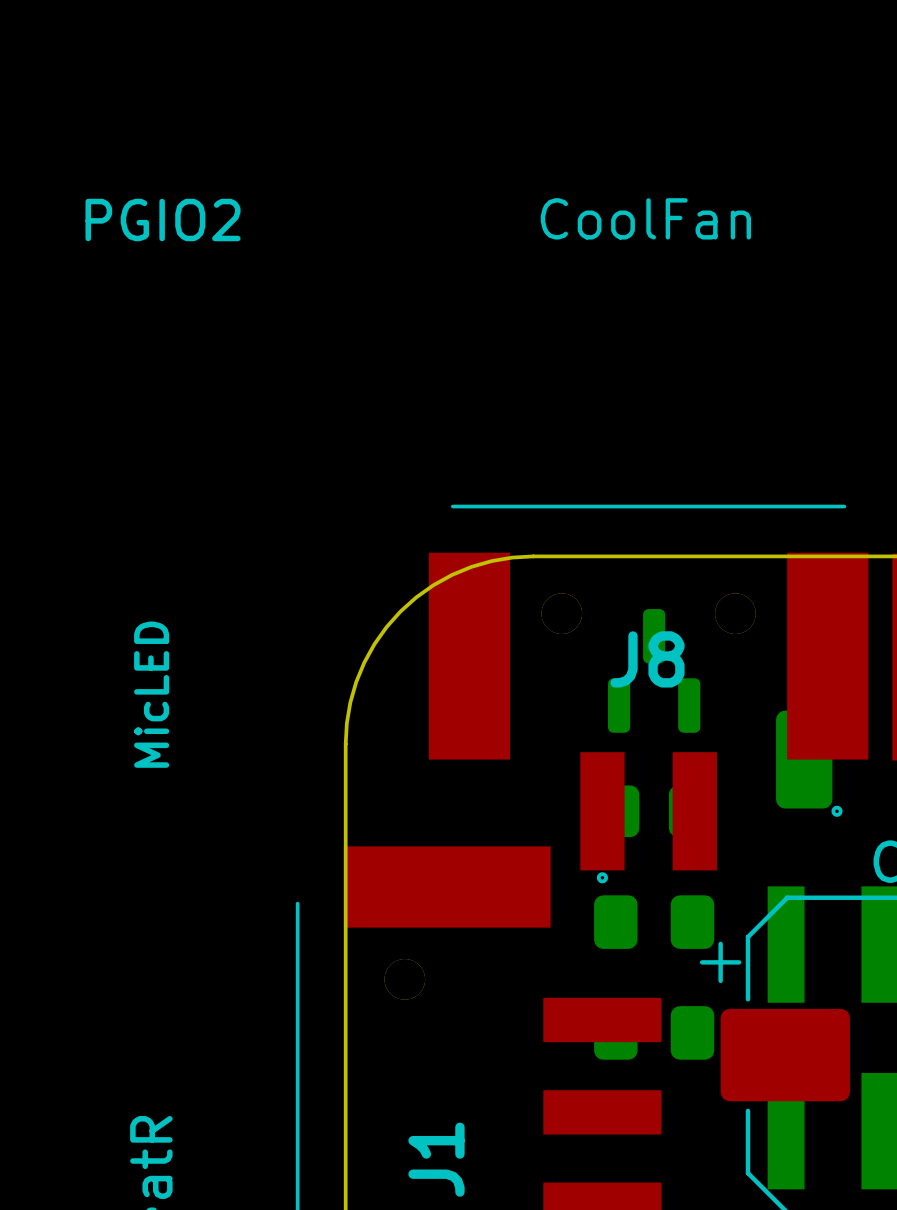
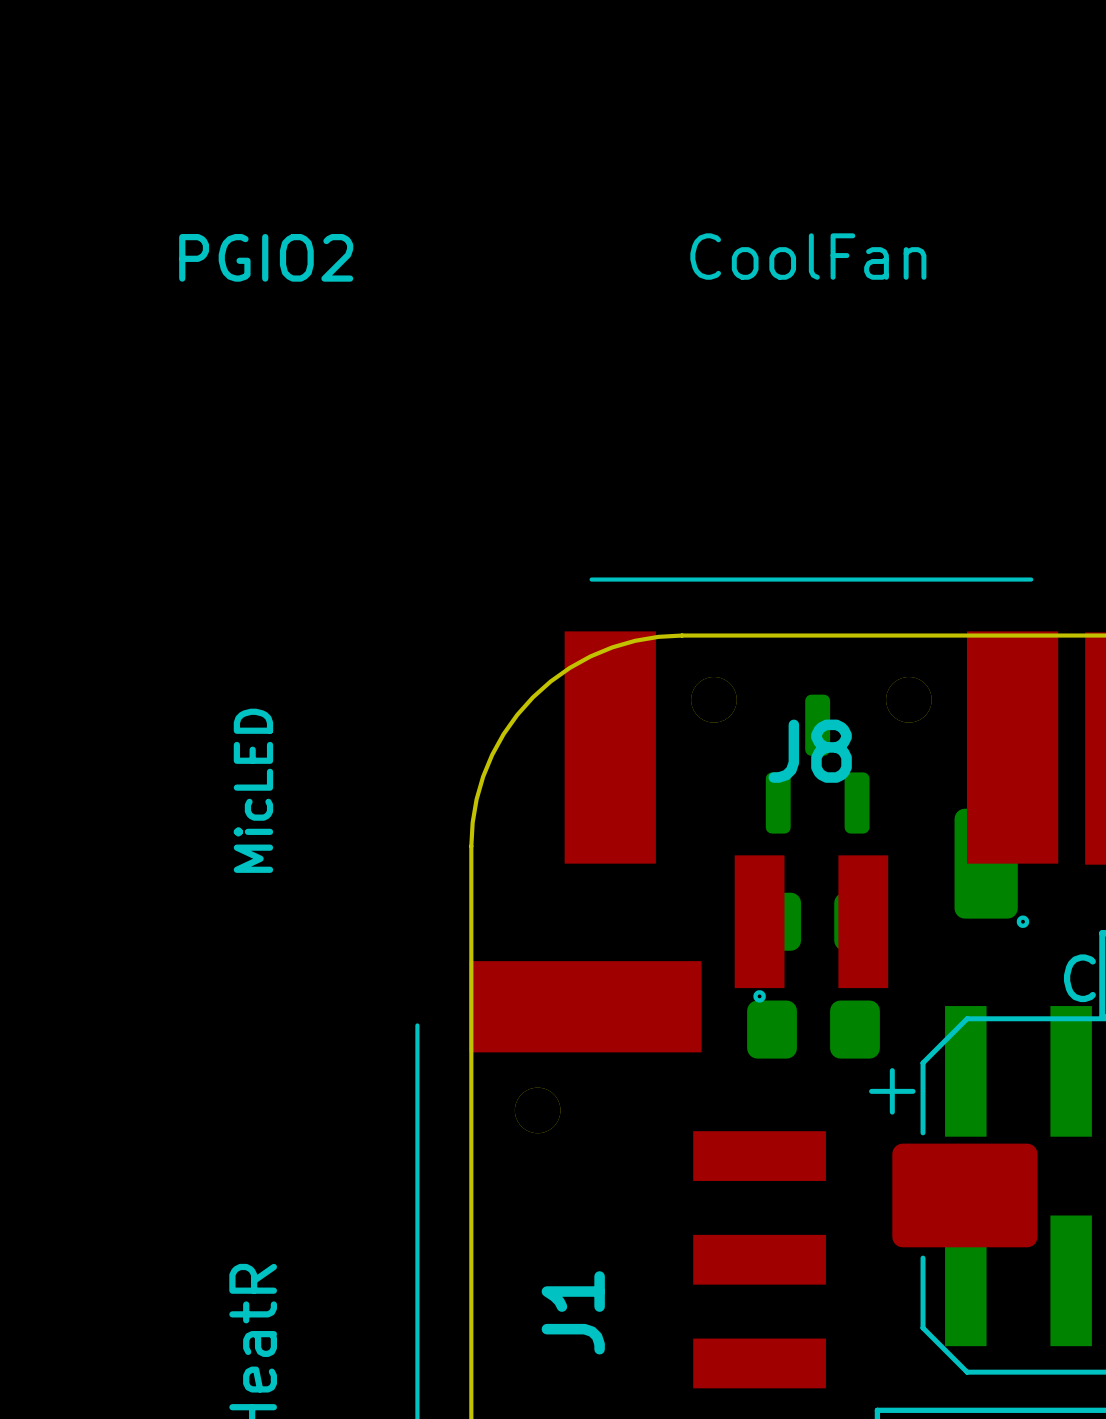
part footprint: [594, 895, 715, 949] -> [747, 1000, 880, 1059]
part: (654, 1032) -> none

